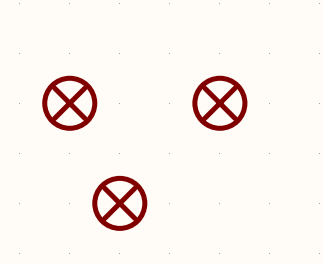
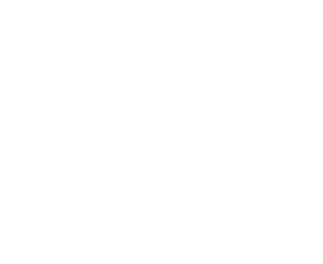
part: (69, 103) -> none
part: (219, 103) -> none
part: (119, 203) -> none

